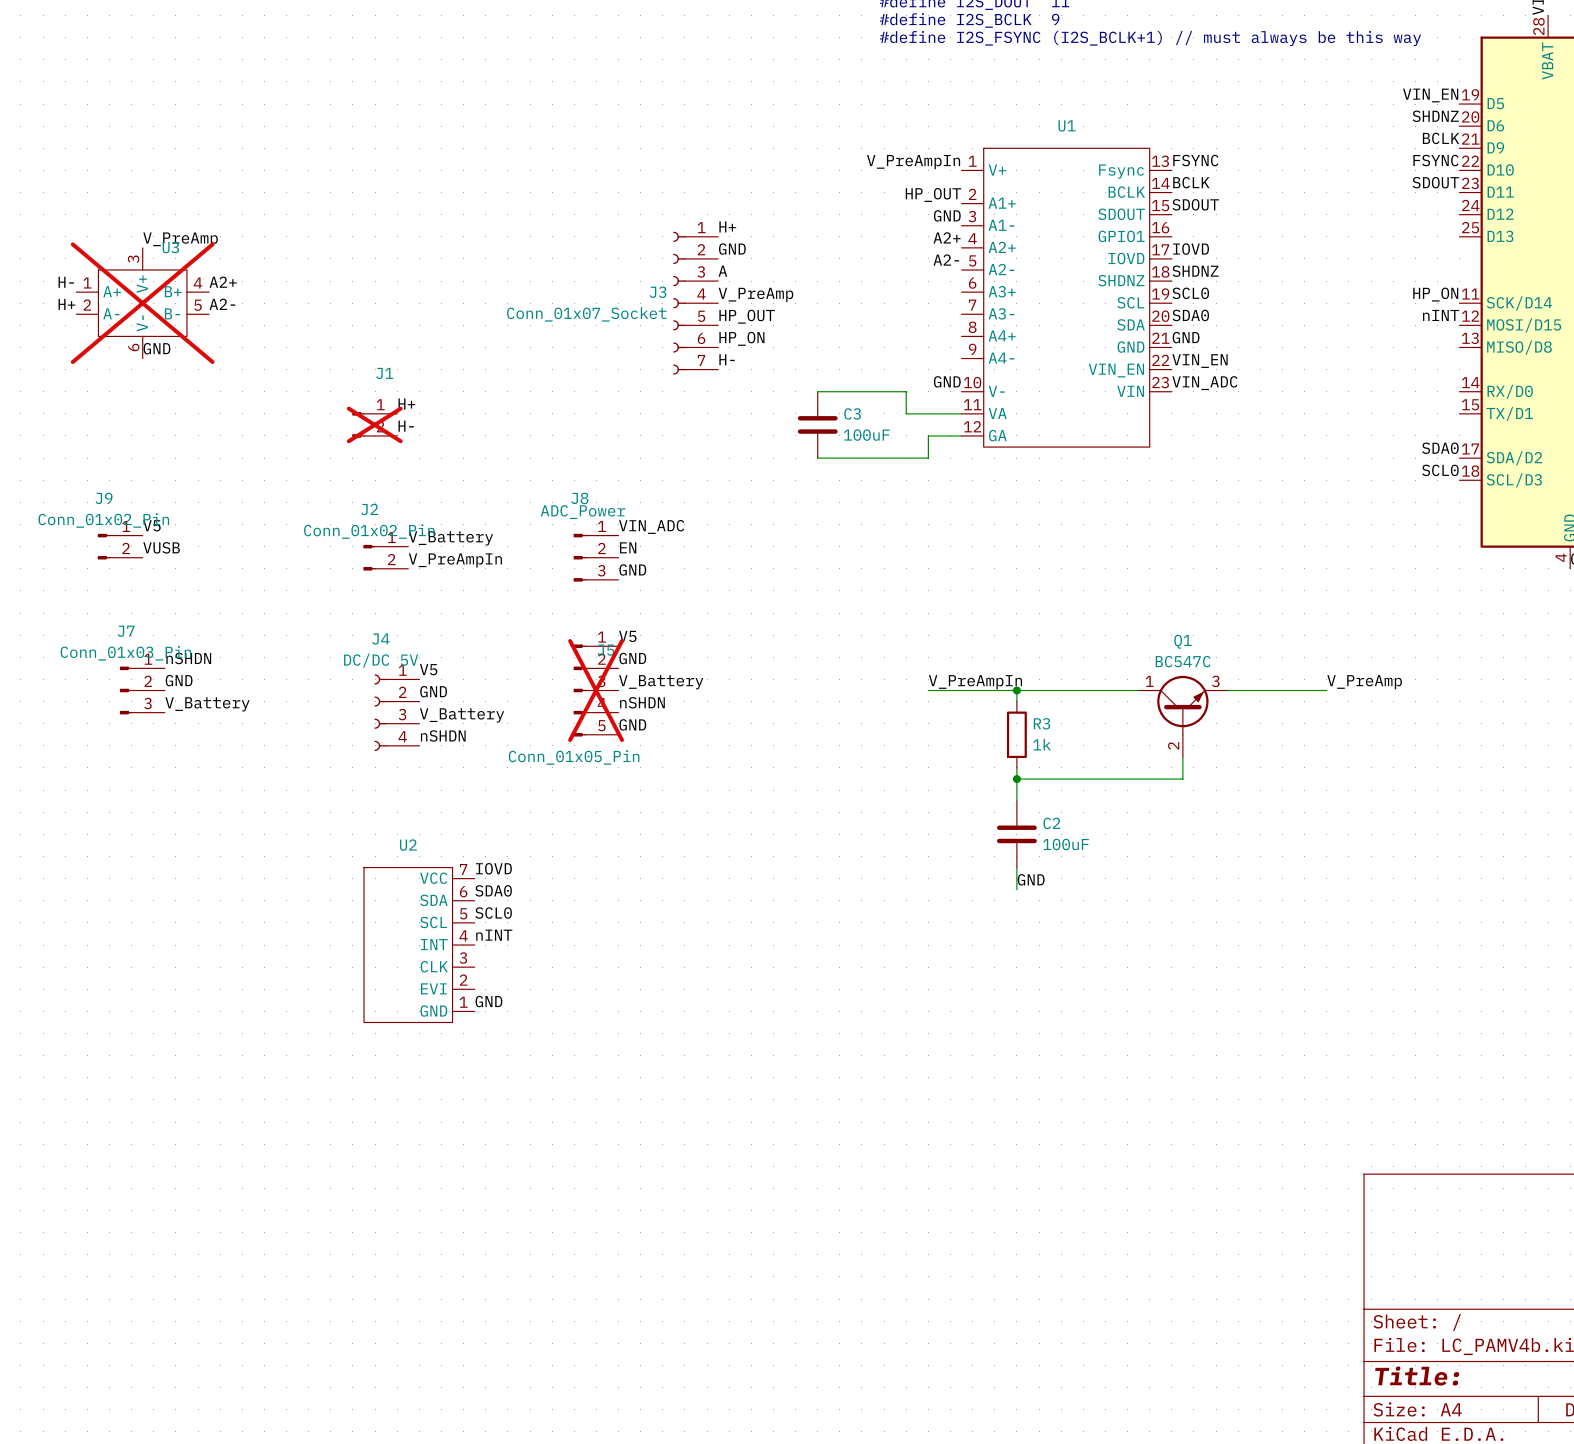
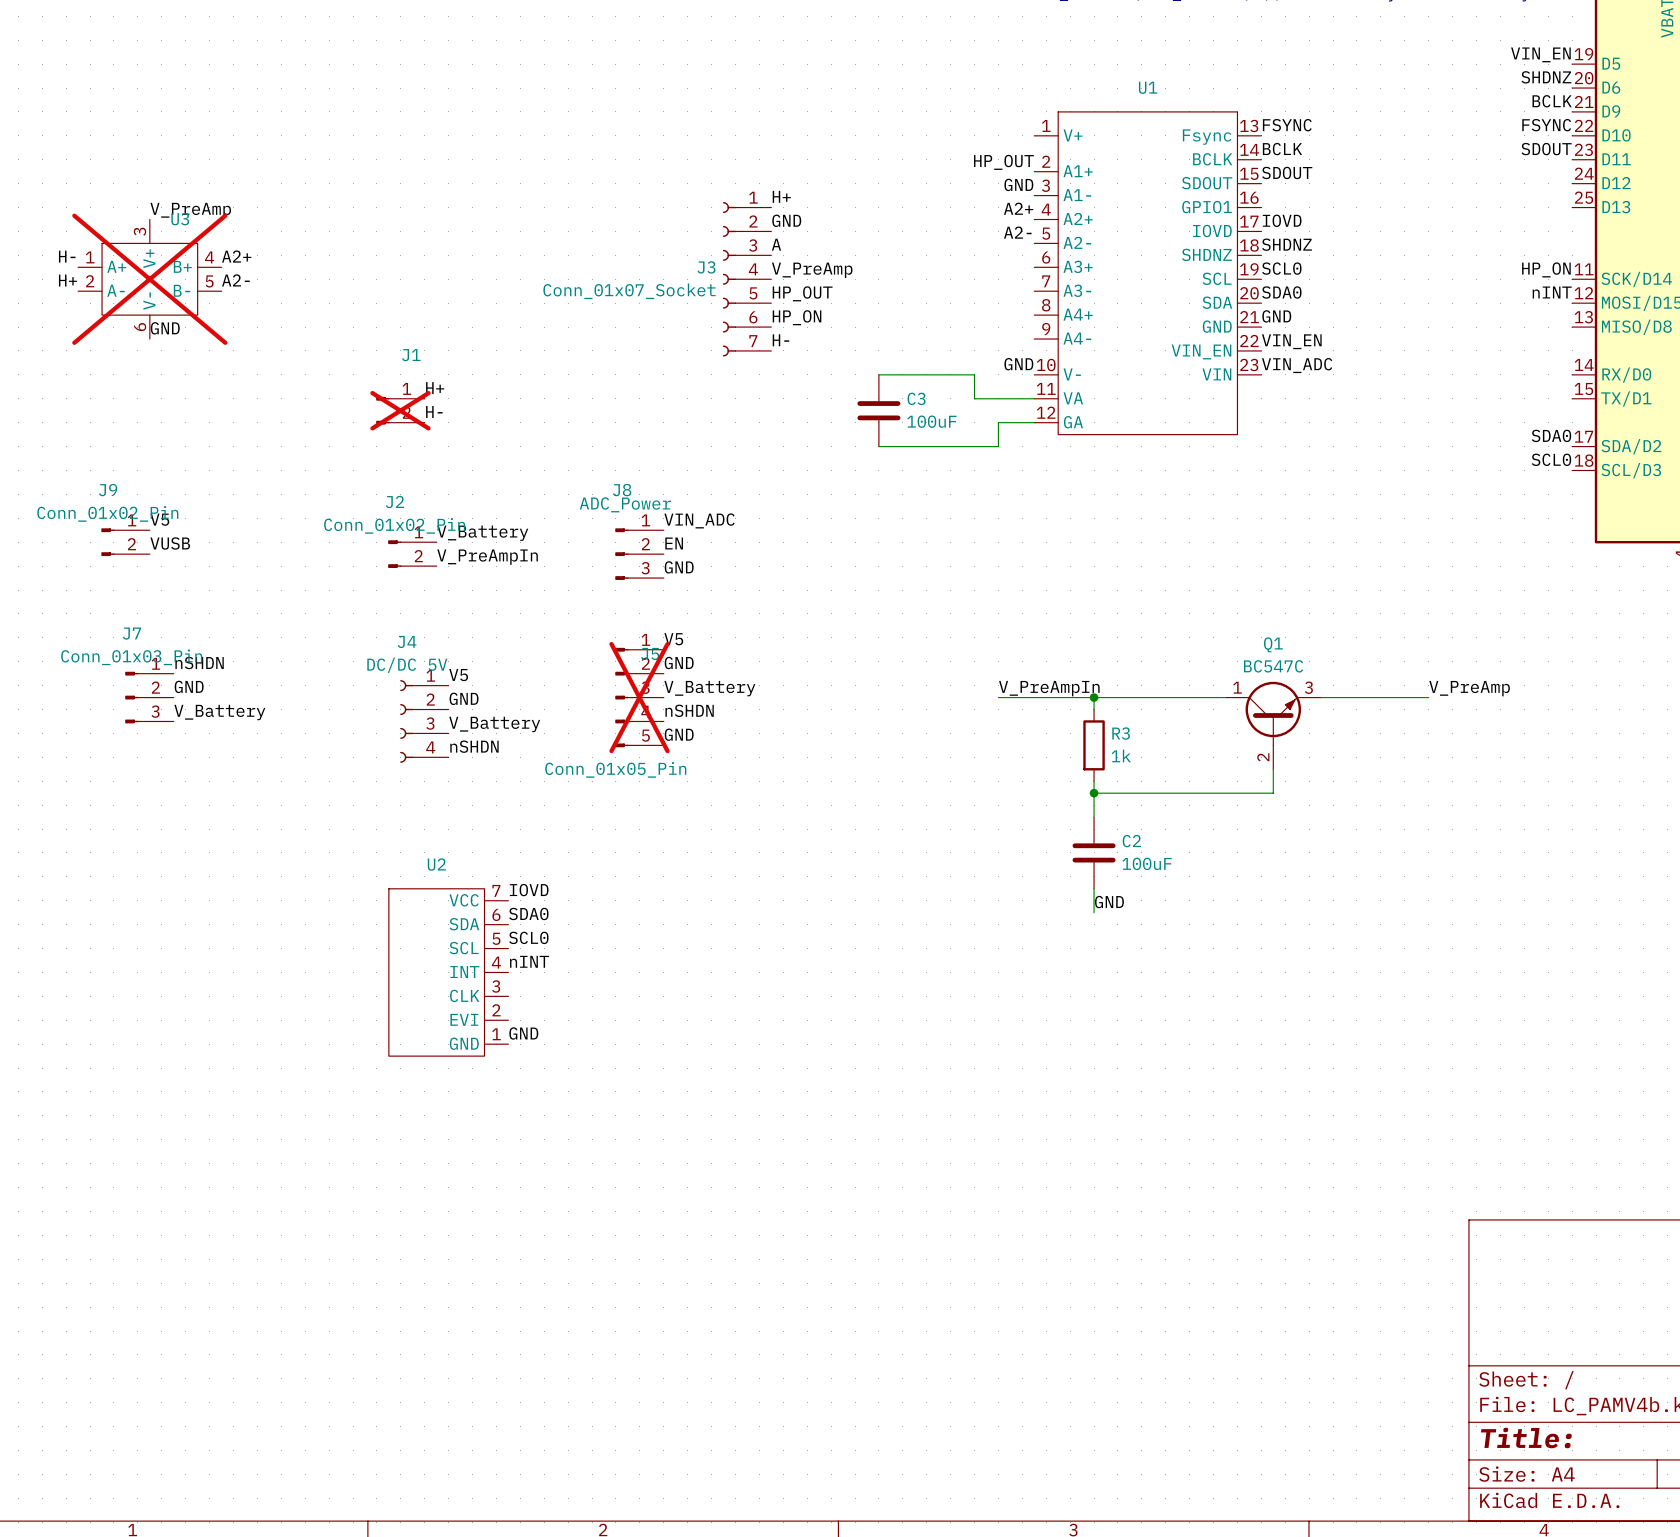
label: V_PreAmpIn (913, 162) -> none

